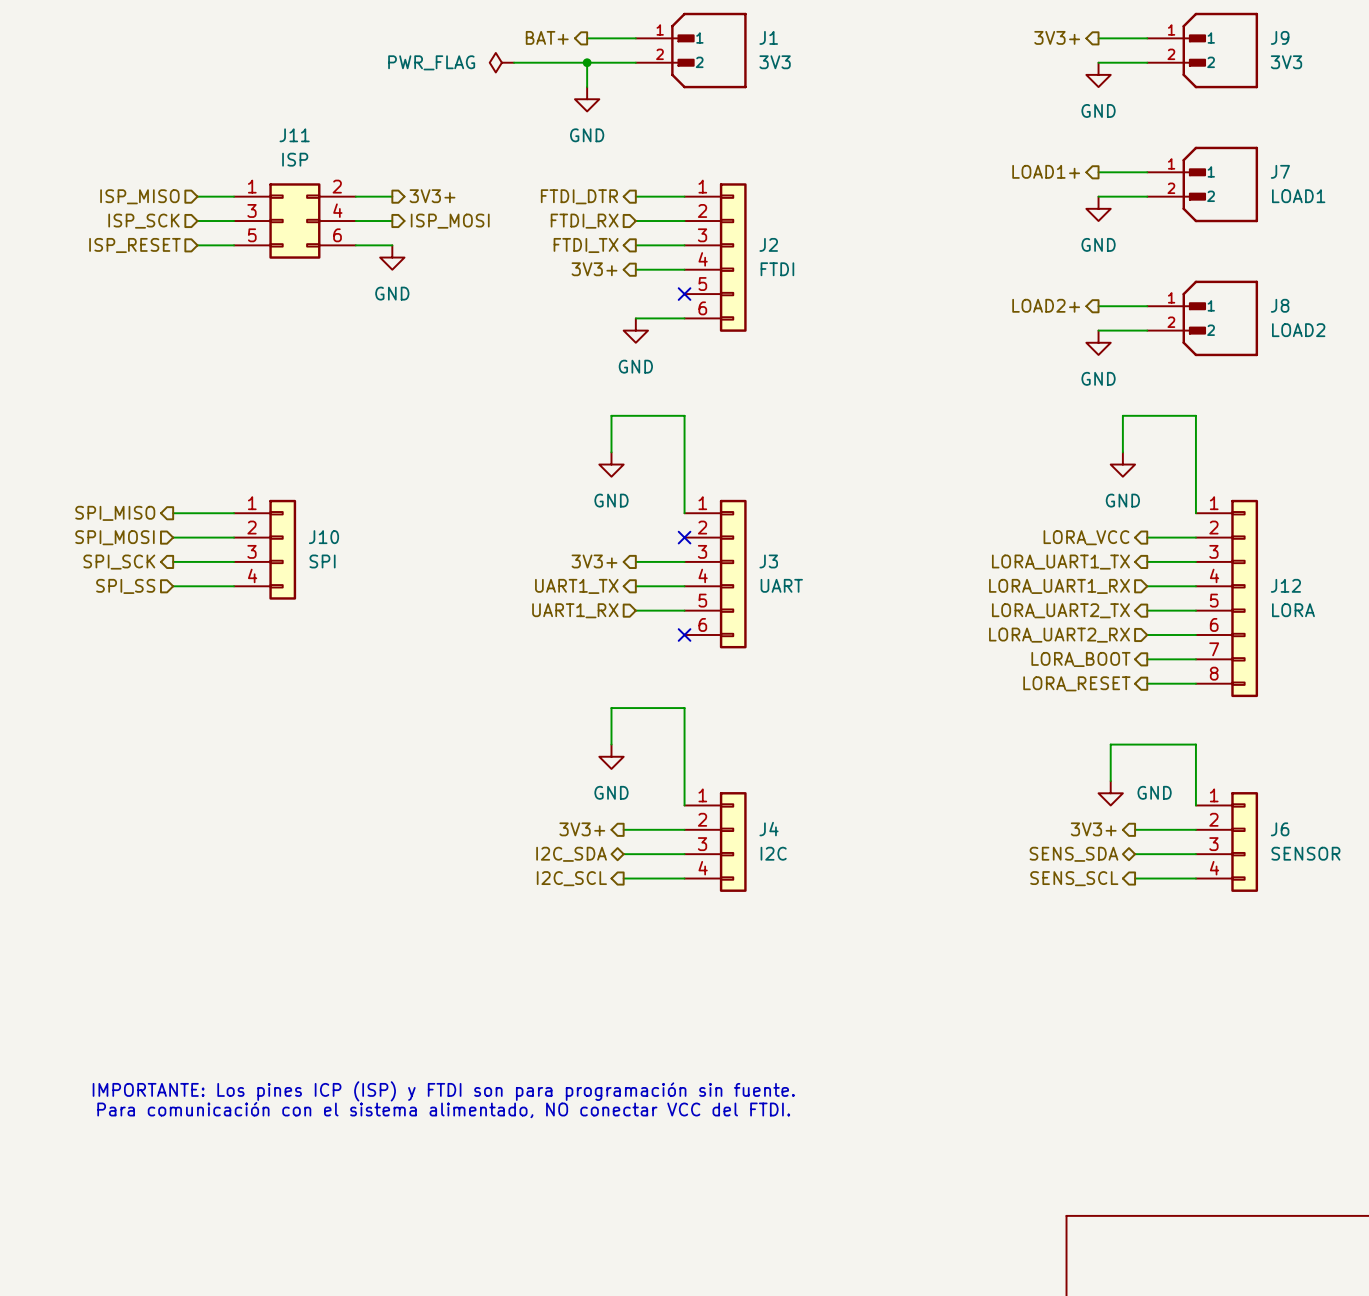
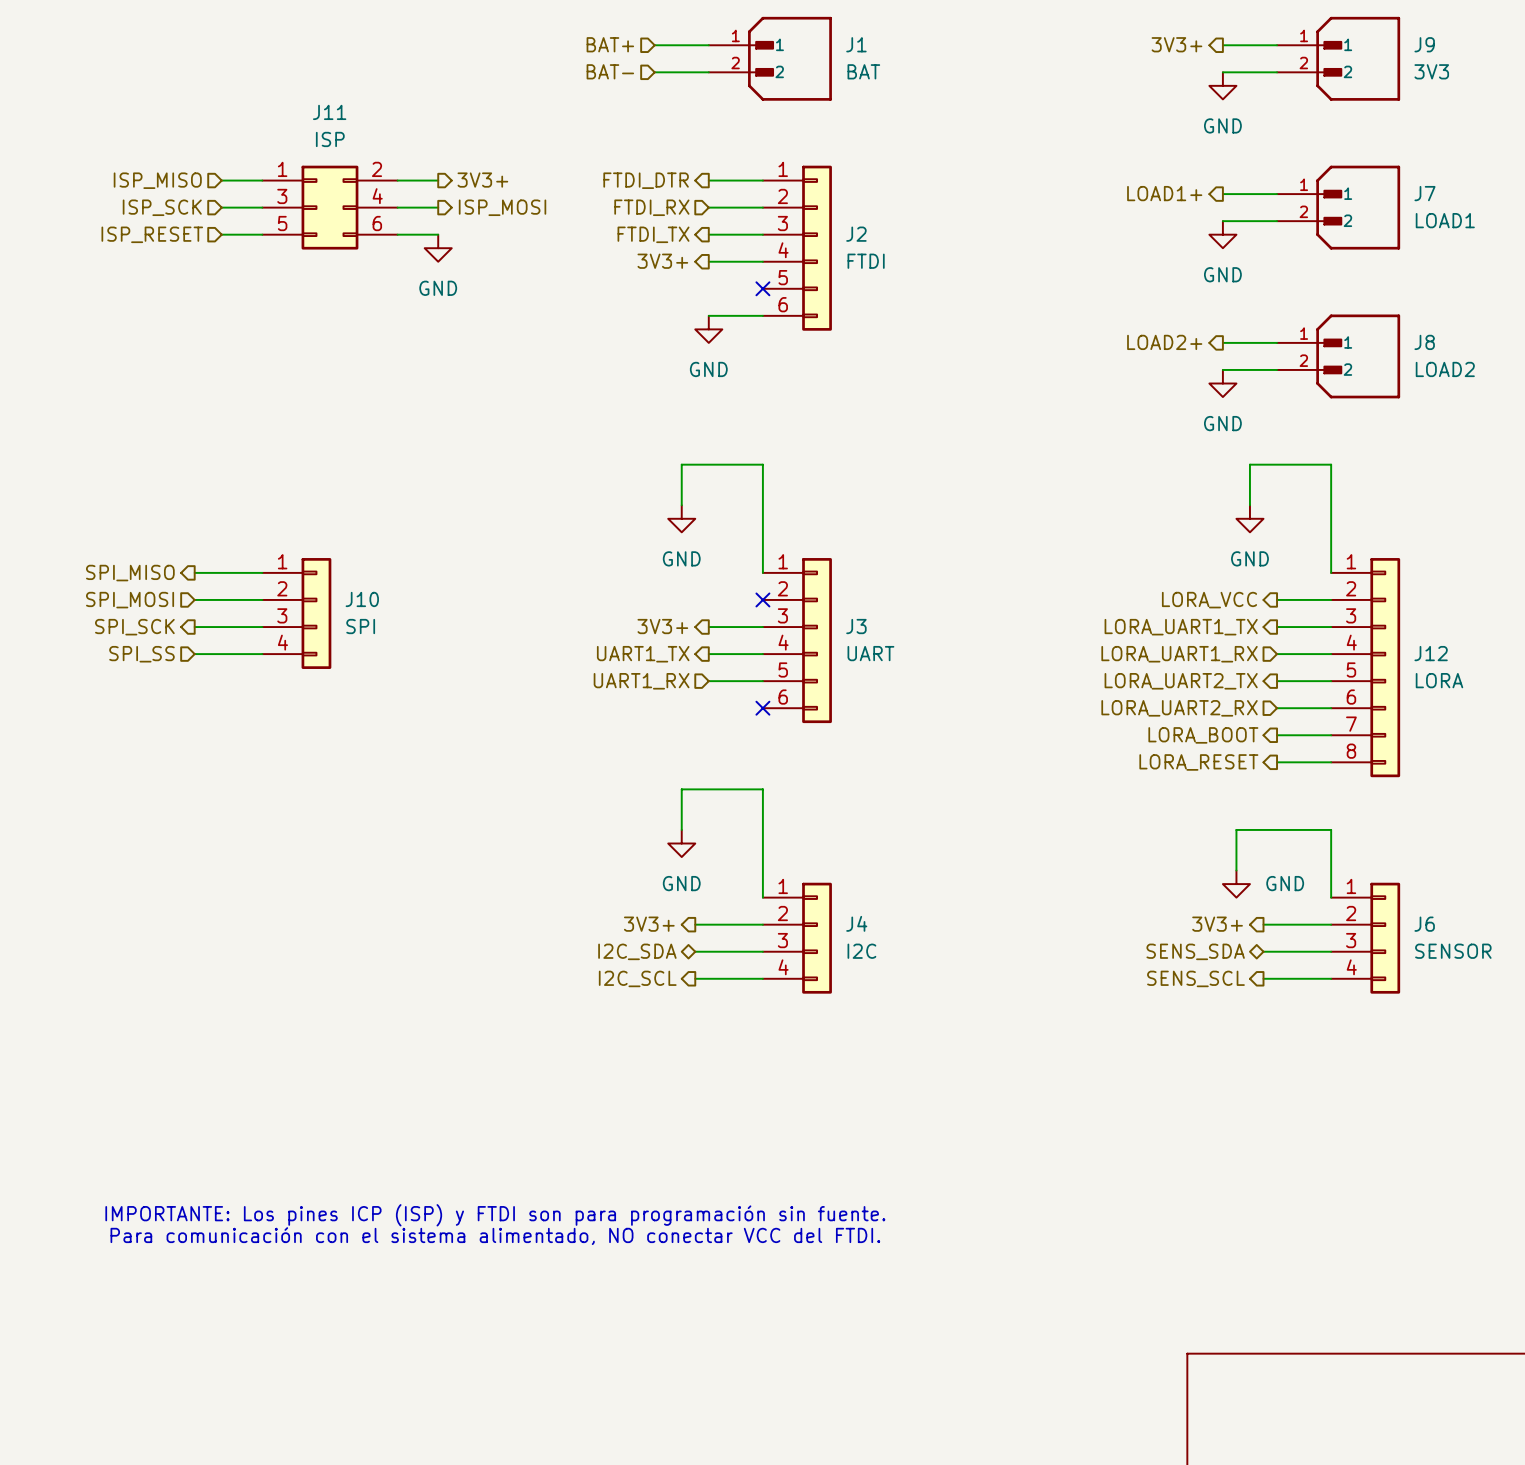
hierarchical label shape: output (547, 37) -> input (610, 44)
power symbol: PWR_FLAG (501, 62) -> none
wire: (514, 62) (587, 62) (587, 87) -> none
hierarchical label: none -> BAT- (610, 71)
junction: (587, 62) -> none
J1 value: 3V3 (775, 62) -> BAT (863, 71)
power symbol: GND (587, 99) -> none
hierarchical label position: ISP_MISO (139, 196) -> ISP_MISO (157, 180)
wire: (197, 196) (234, 196) -> (221, 180) (262, 180)
wire: (355, 196) (392, 196) -> (397, 180) (438, 180)
hierarchical label position: 3V3+ (432, 196) -> 3V3+ (482, 180)
hierarchical label position: FTDI_DTR (579, 196) -> FTDI_DTR (646, 180)
wire: (635, 196) (684, 196) -> (708, 180) (762, 180)
hierarchical label position: ISP_SCK (143, 221) -> ISP_SCK (162, 207)
wire: (197, 221) (234, 221) -> (221, 207) (262, 207)
J11 position: (294, 221) -> (329, 207)
wire: (355, 221) (392, 221) -> (397, 207) (438, 207)
hierarchical label position: ISP_MOSI (450, 221) -> ISP_MOSI (502, 207)
hierarchical label position: FTDI_RX (584, 221) -> FTDI_RX (651, 207)
wire: (635, 221) (684, 221) -> (708, 207) (762, 207)
hierarchical label position: ISP_RESET (134, 245) -> ISP_RESET (152, 234)
wire: (197, 245) (234, 245) -> (221, 234) (262, 234)
wire: (355, 245) (392, 245) -> (397, 234) (438, 234)
hierarchical label position: FTDI_TX (586, 245) -> FTDI_TX (653, 234)
wire: (635, 245) (684, 245) -> (708, 234) (762, 234)
power symbol position: GND (392, 257) -> GND (438, 248)
J2 position: (715, 257) -> (797, 248)
hierarchical label position: 3V3+ (594, 269) -> 3V3+ (662, 261)
wire: (635, 269) (684, 269) -> (708, 261) (762, 261)
no-connect mark position: (684, 294) -> (762, 288)
wire: (635, 318) (684, 318) -> (708, 315) (762, 315)
power symbol position: GND (635, 330) -> GND (708, 329)

